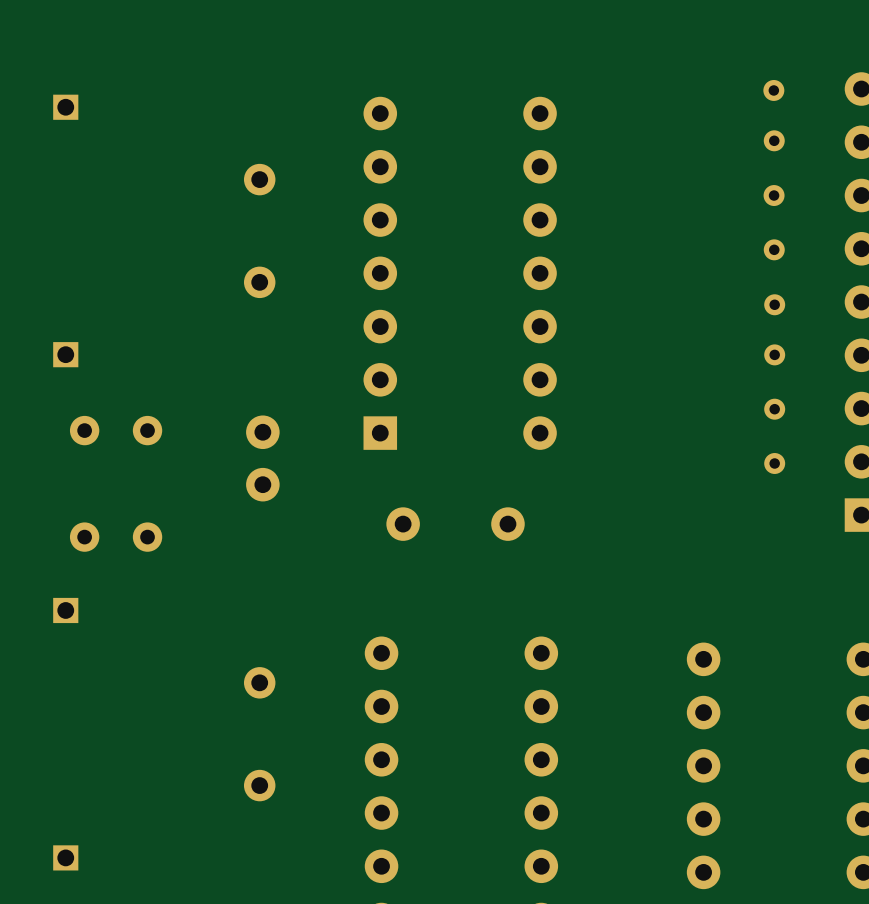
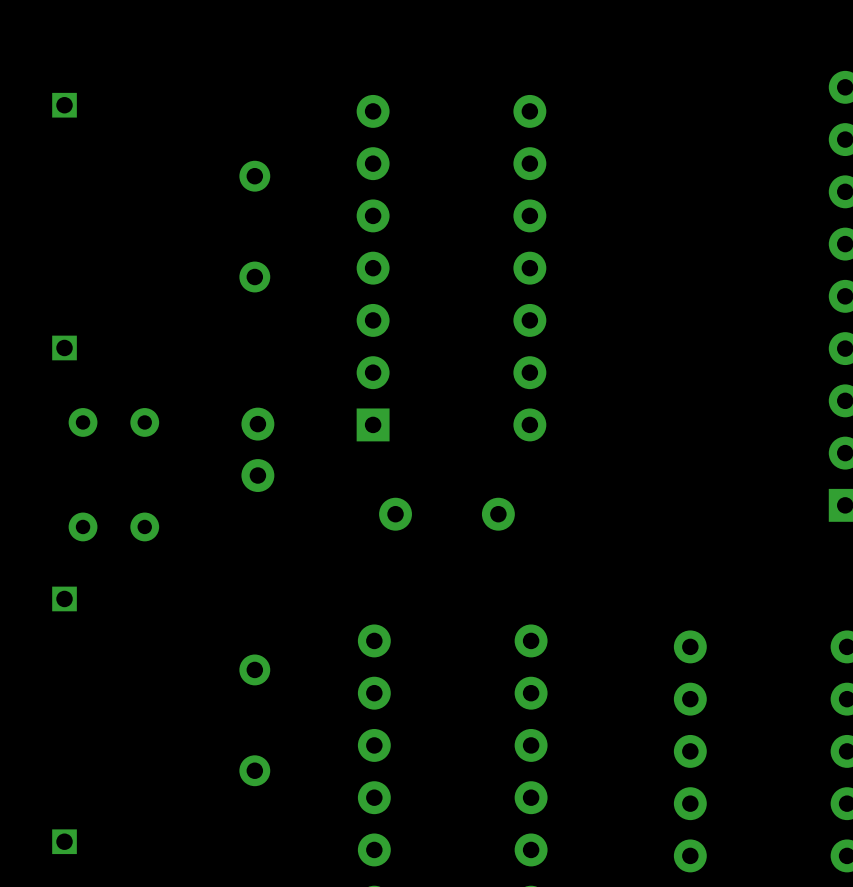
part: (773, 90) -> none
part: (774, 140) -> none
part: (774, 195) -> none
part: (774, 249) -> none
part: (774, 304) -> none
part: (774, 354) -> none
part: (774, 409) -> none
part: (774, 463) -> none

